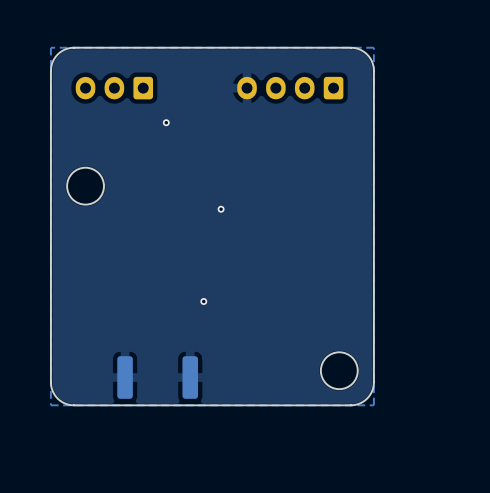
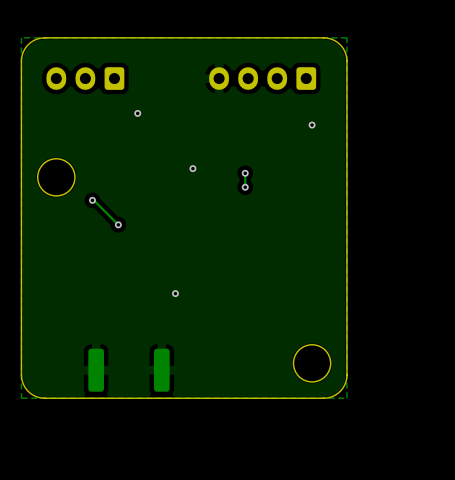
via: none -> (312, 125)
via: none -> (192, 168)
track: none -> (245, 173) (245, 187)
via: none -> (245, 173)
via: none -> (245, 187)
track: none -> (92, 200) (118, 224)
via: none -> (92, 200)
via: (221, 209) -> none
via: none -> (118, 224)

